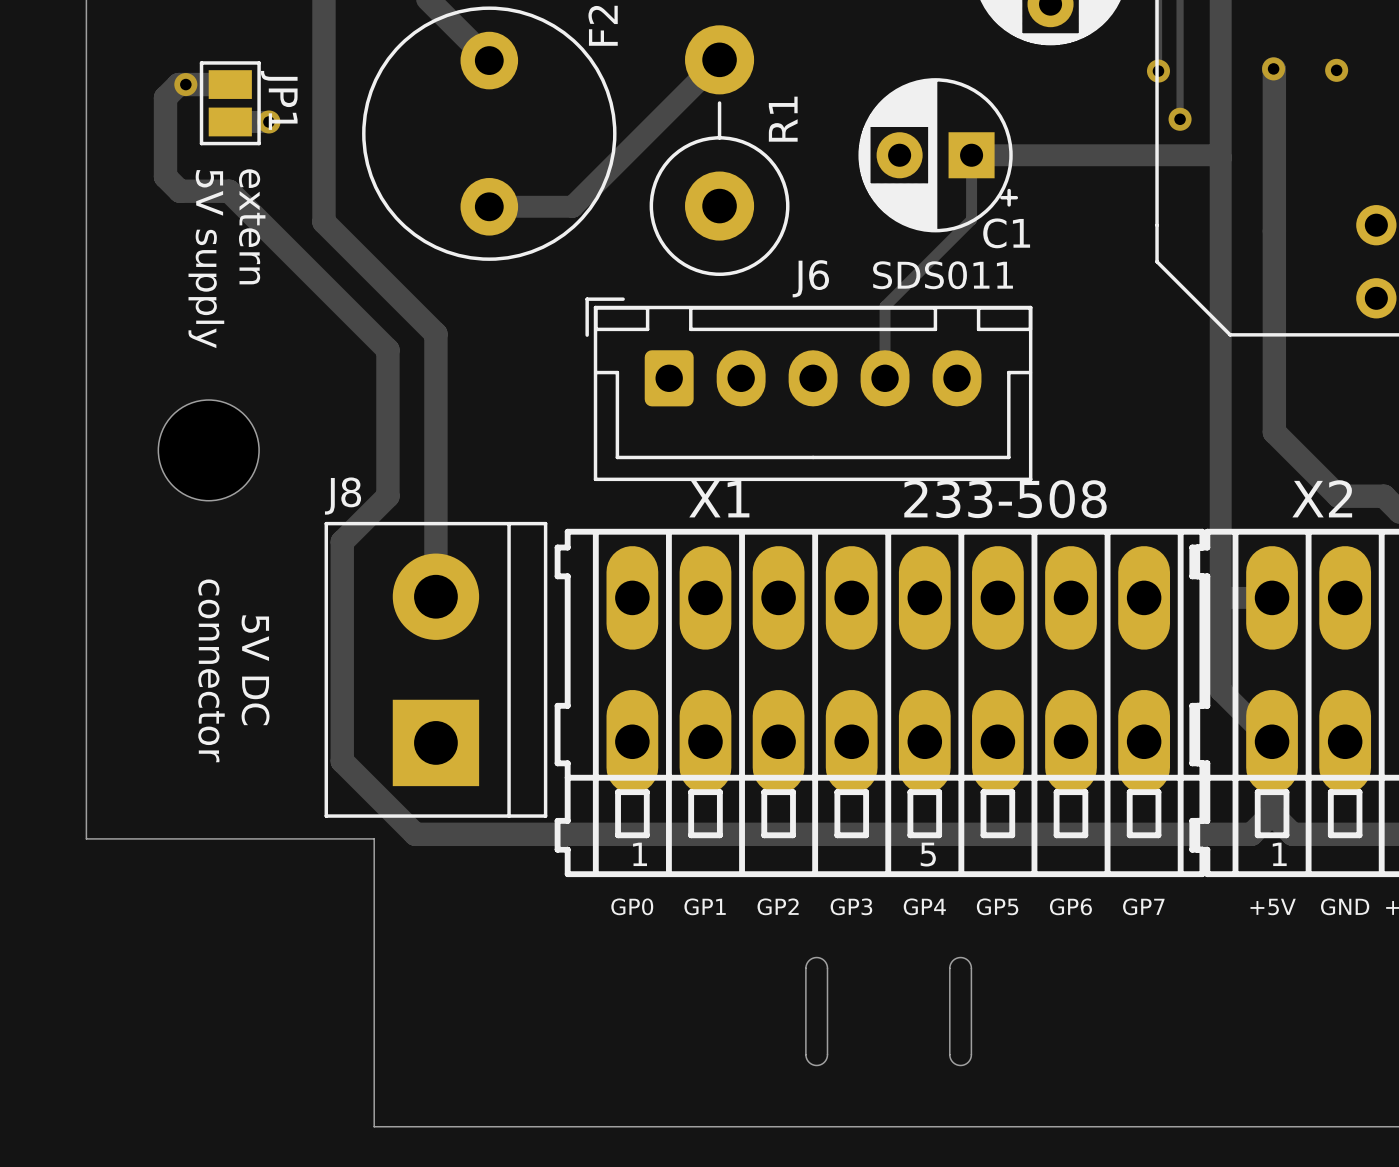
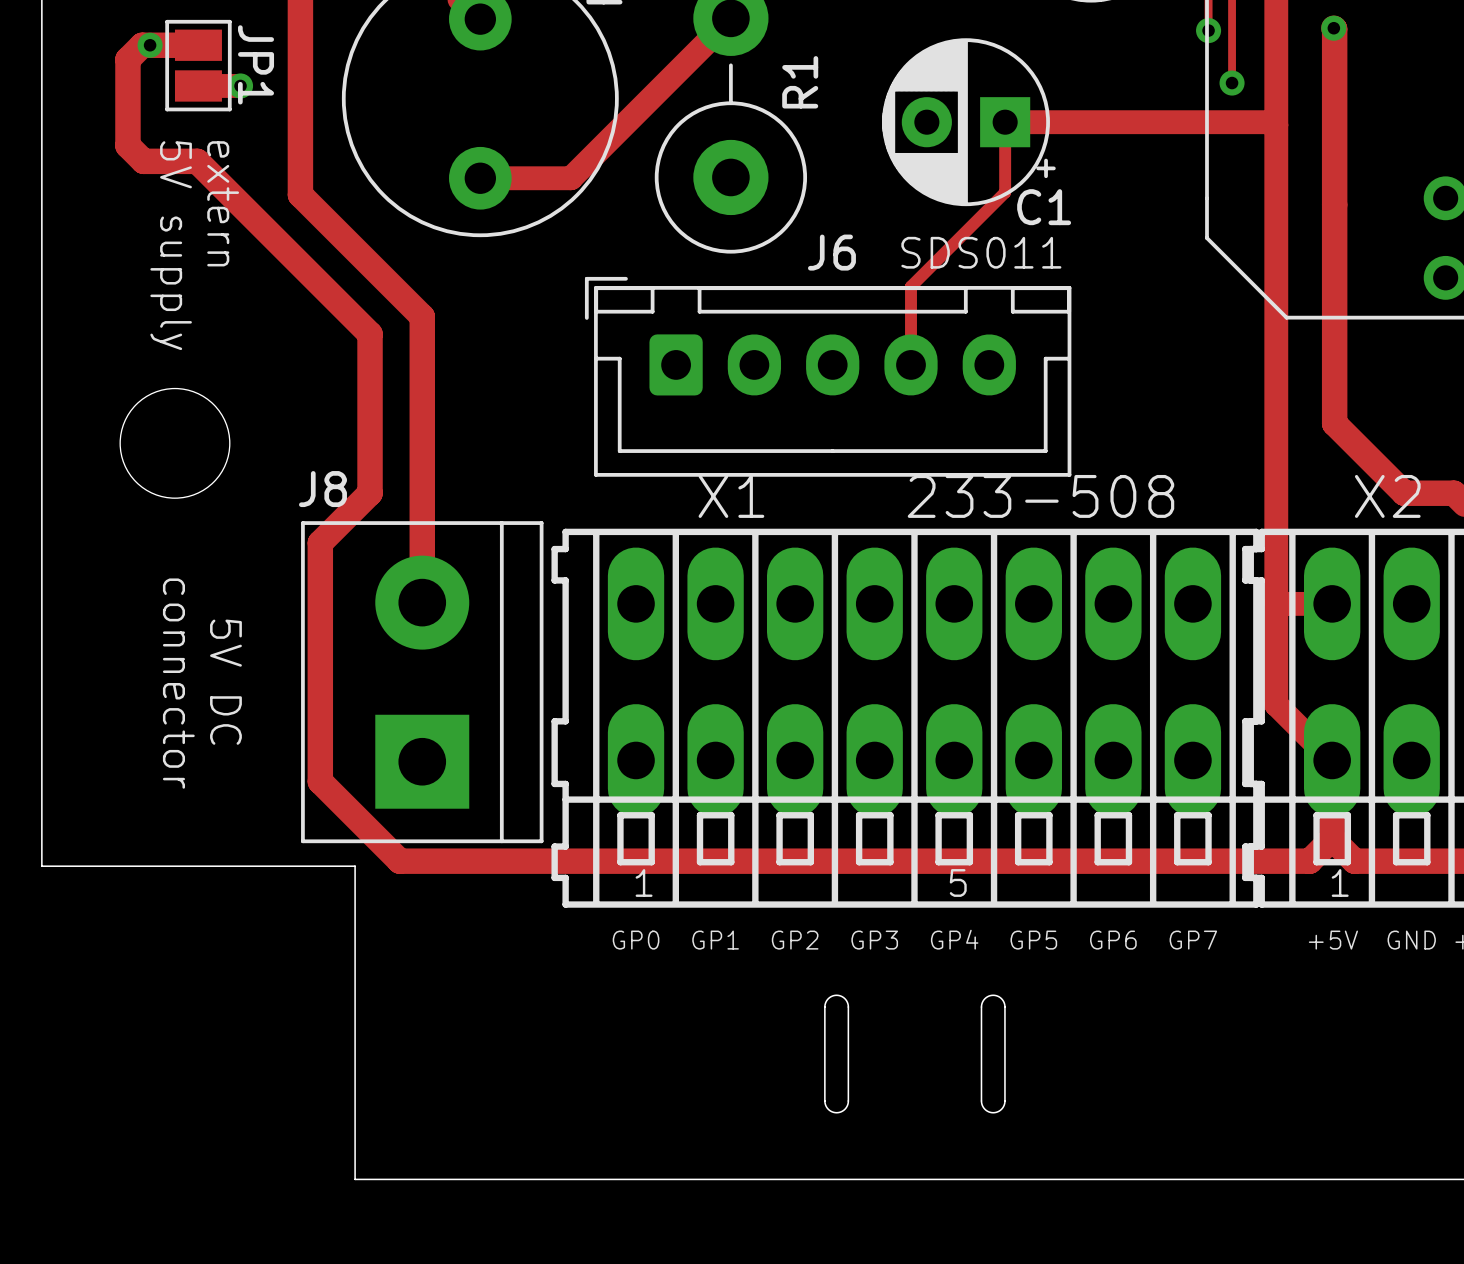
via: (1336, 70) -> none

